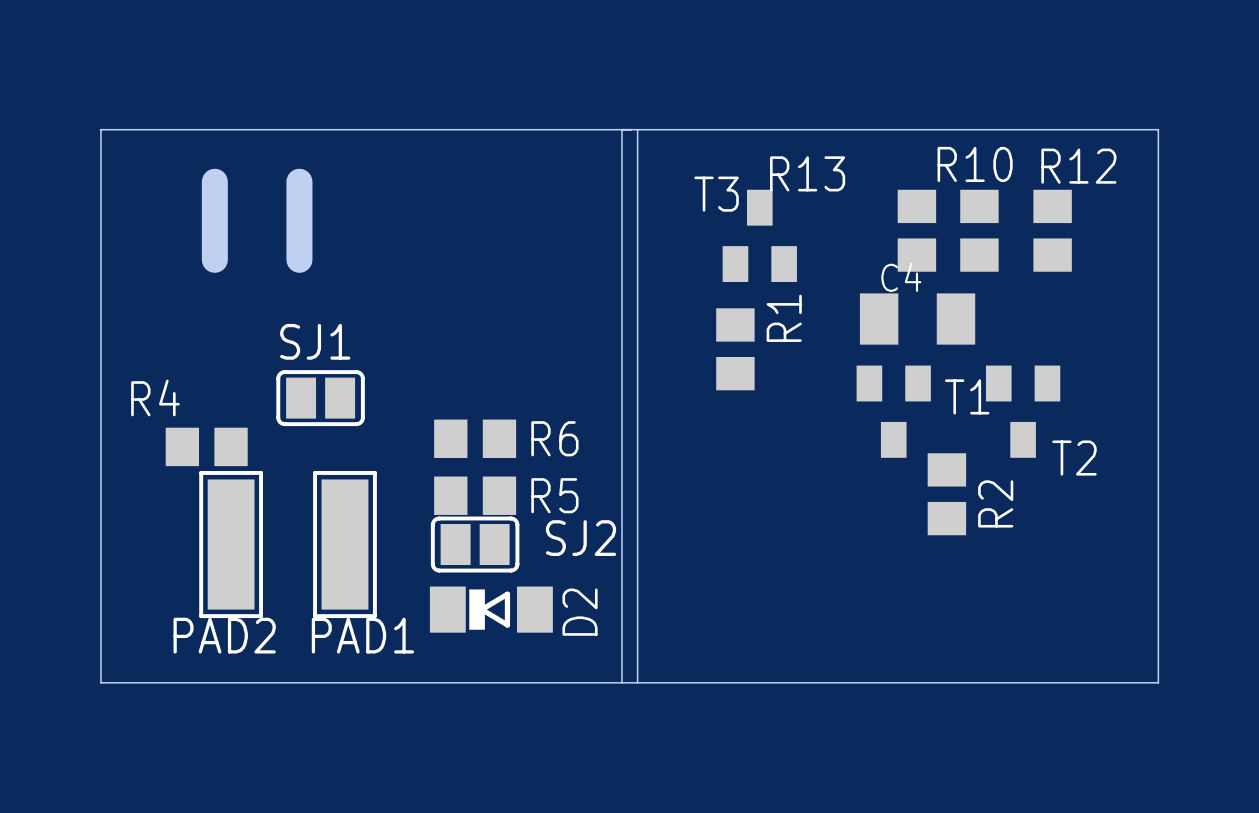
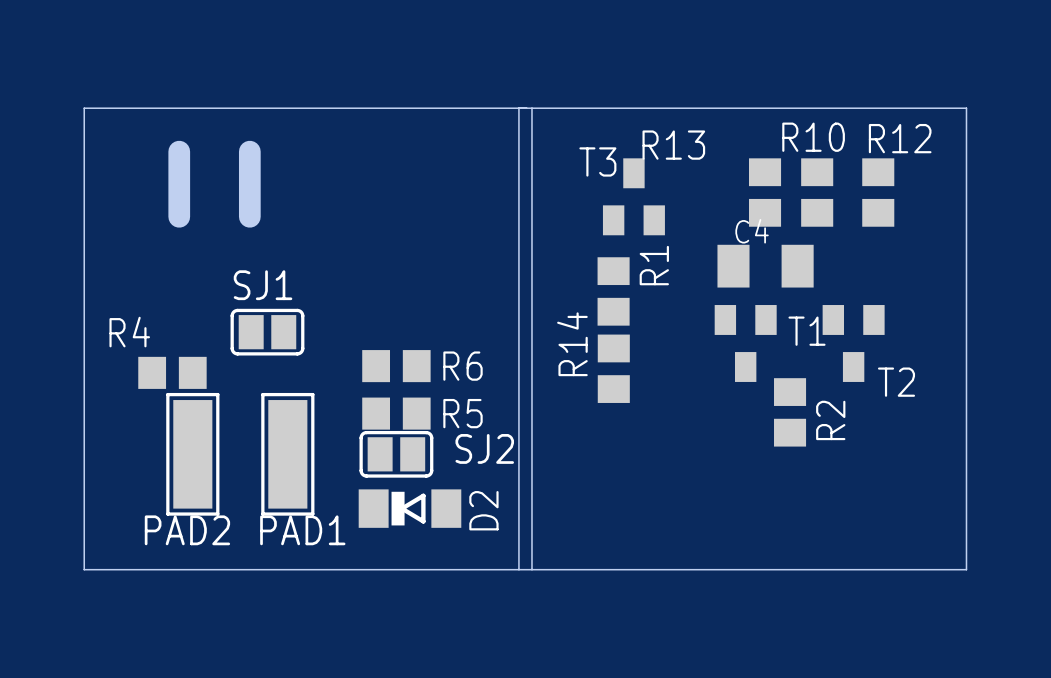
R14: none -> (613, 368)

